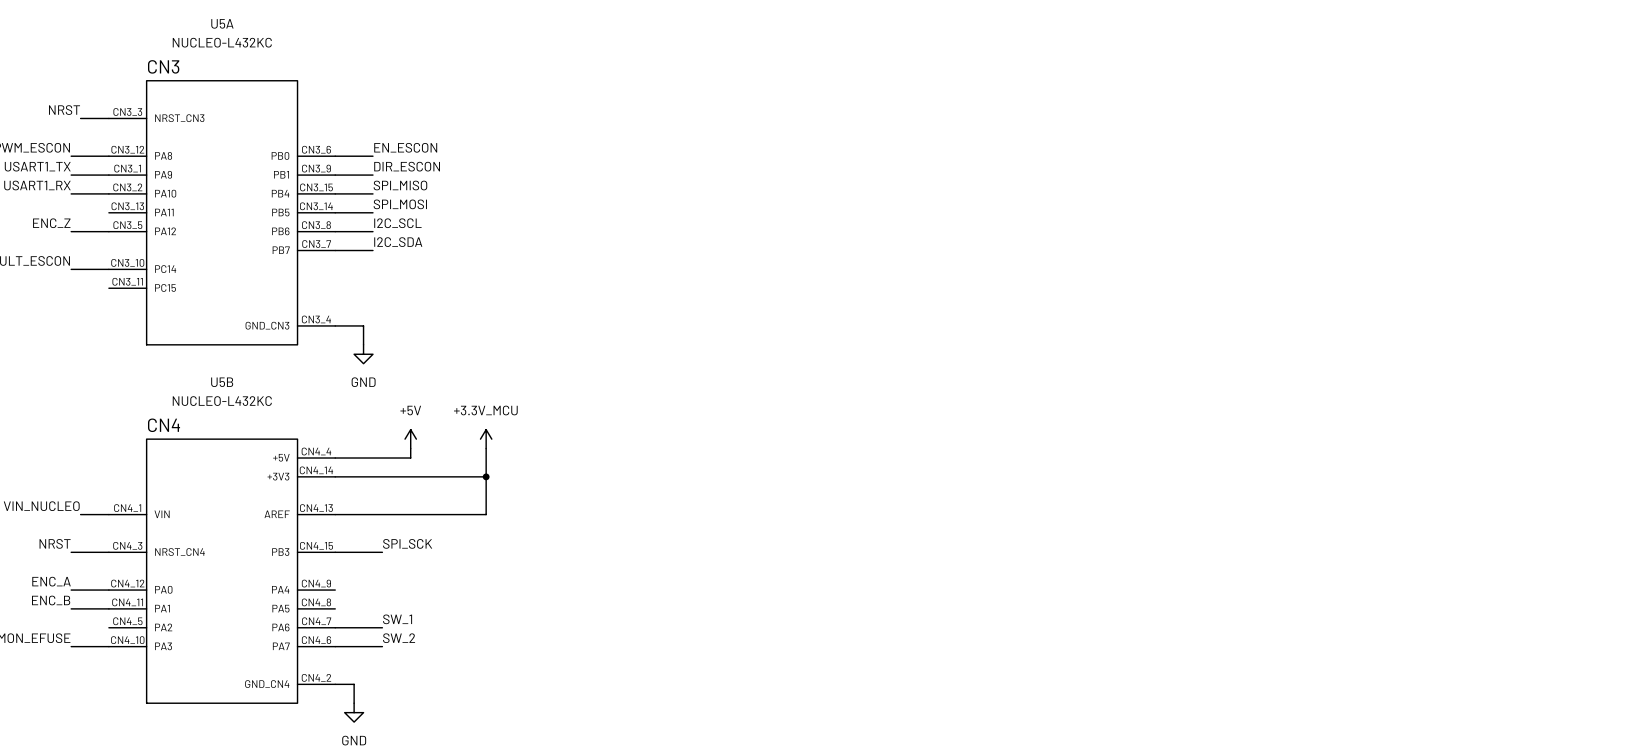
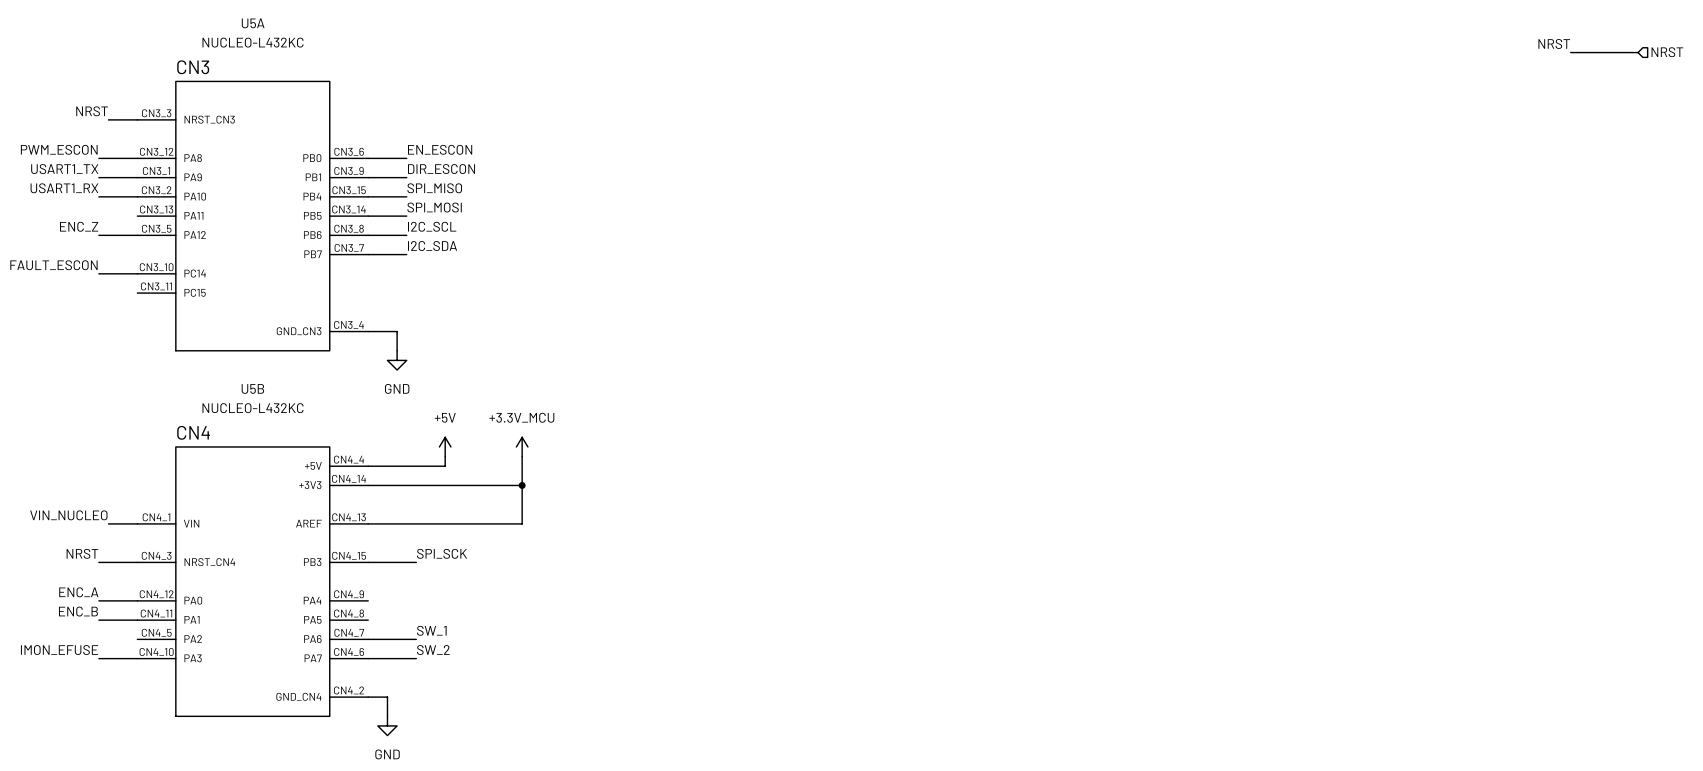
label: none -> NRST (1554, 43)
wire: none -> (1570, 52) (1638, 52)
hierarchical label: none -> NRST (1667, 52)

